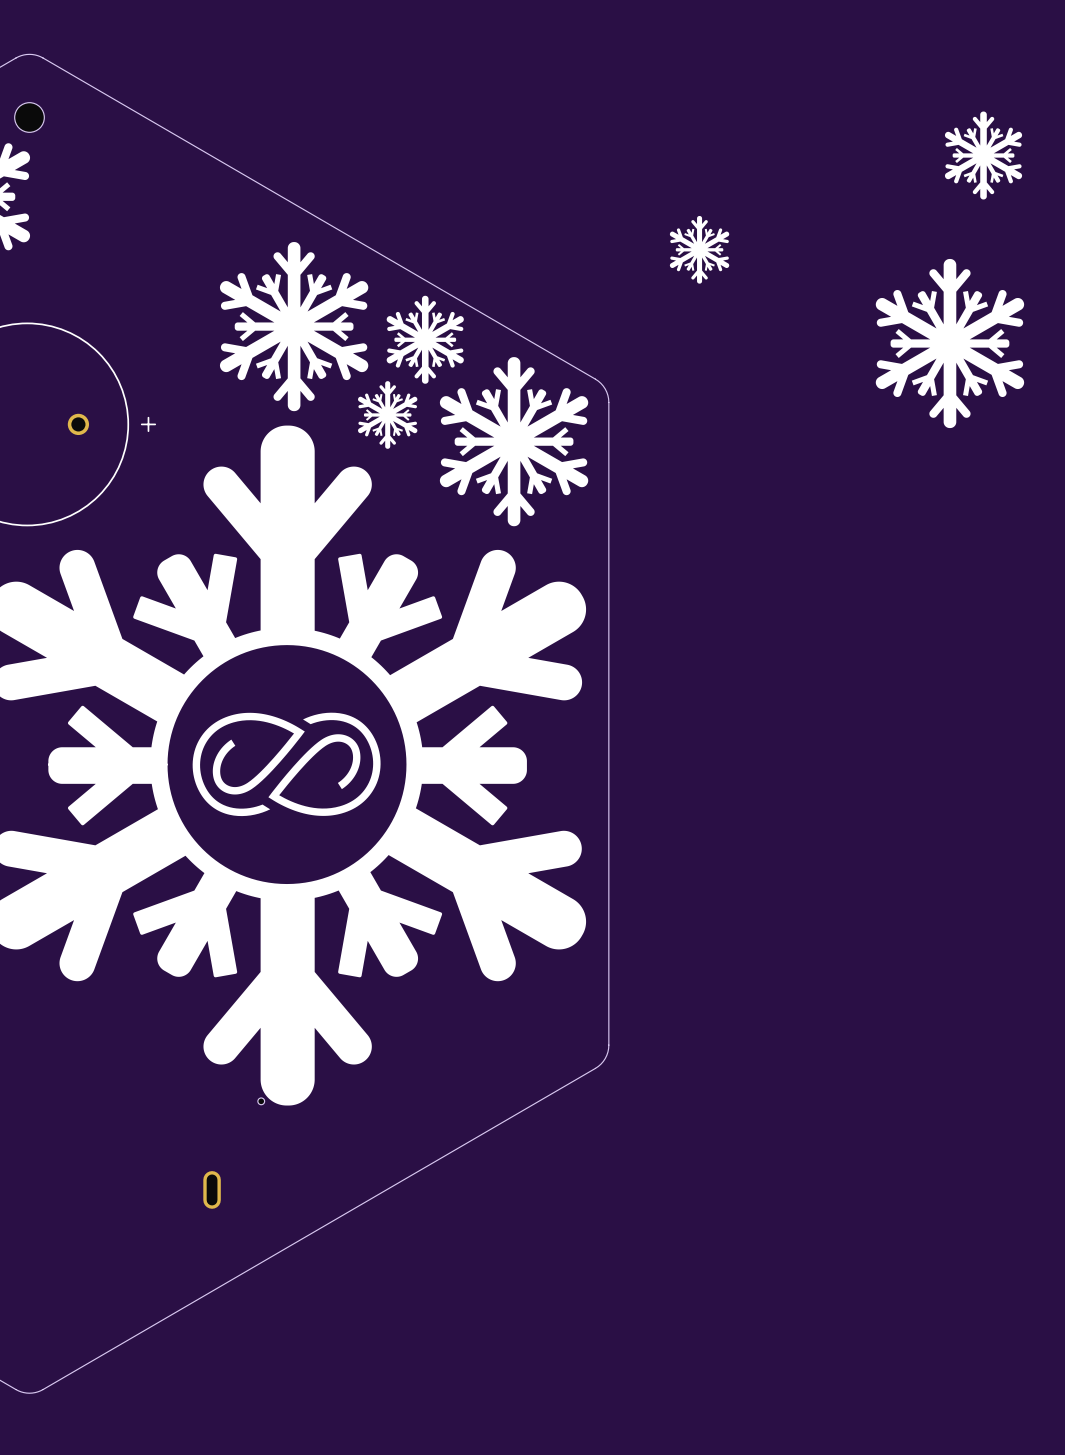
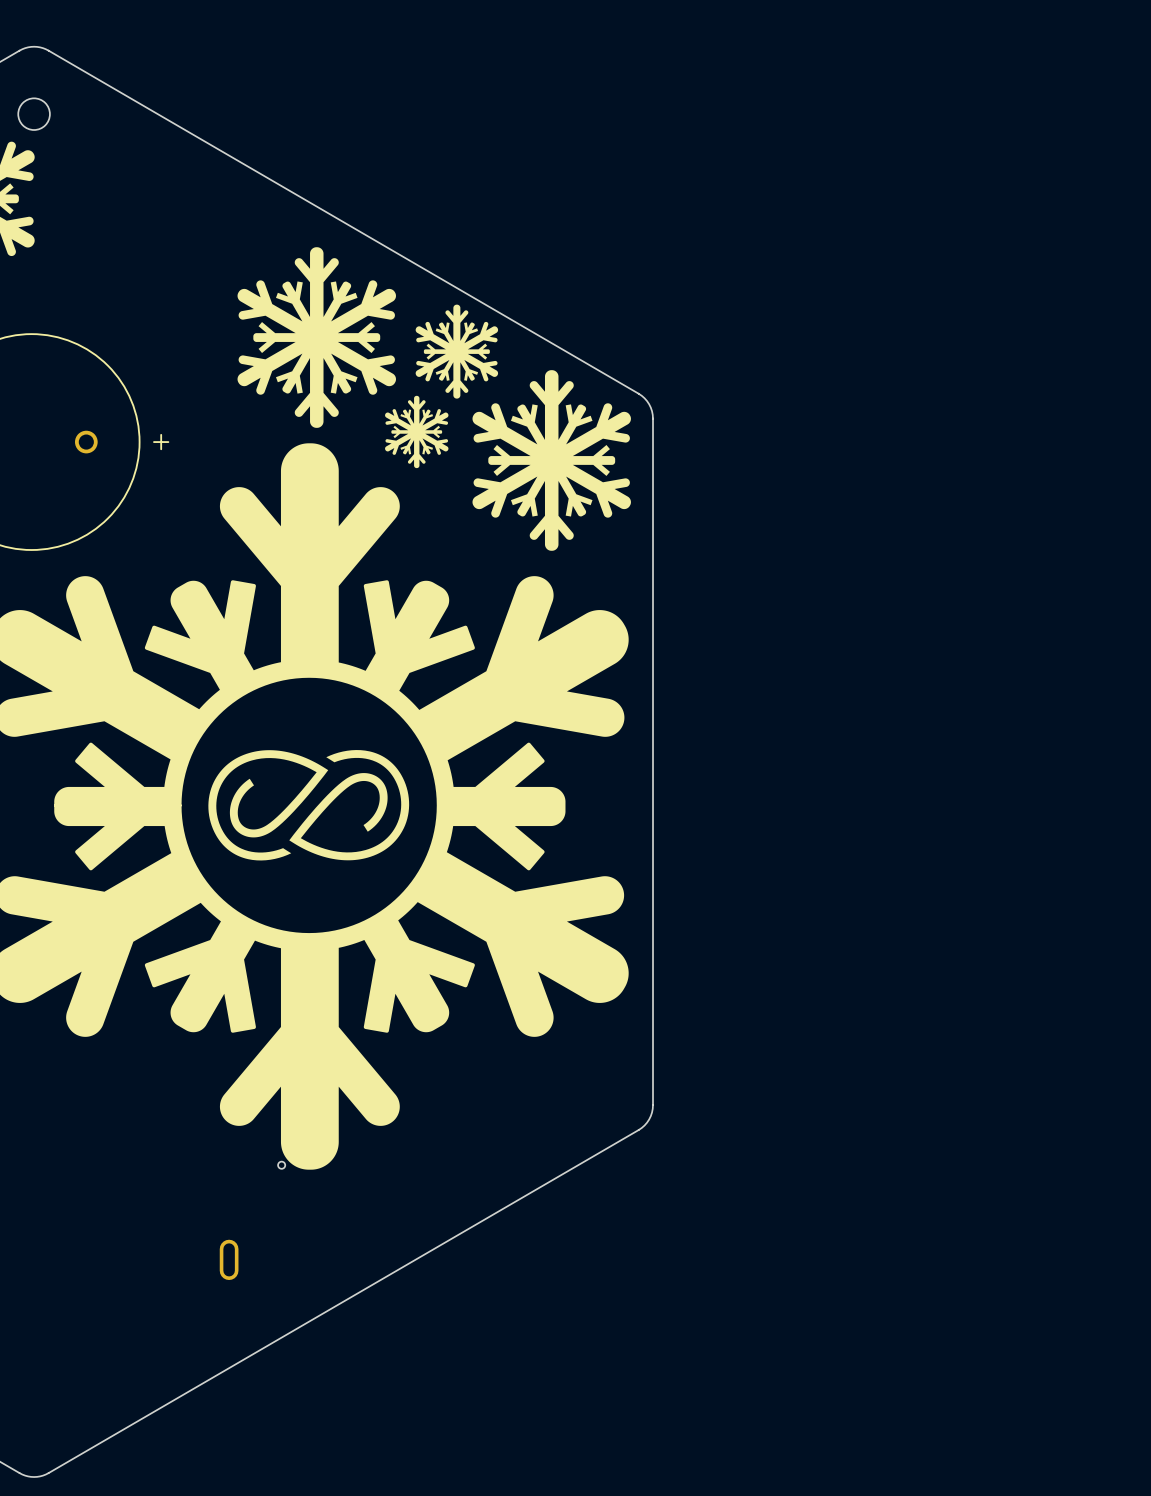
drawing: [944, 111, 1023, 200] -> none
drawing: [669, 215, 730, 284] -> none
drawing: [875, 258, 1025, 429] -> none

